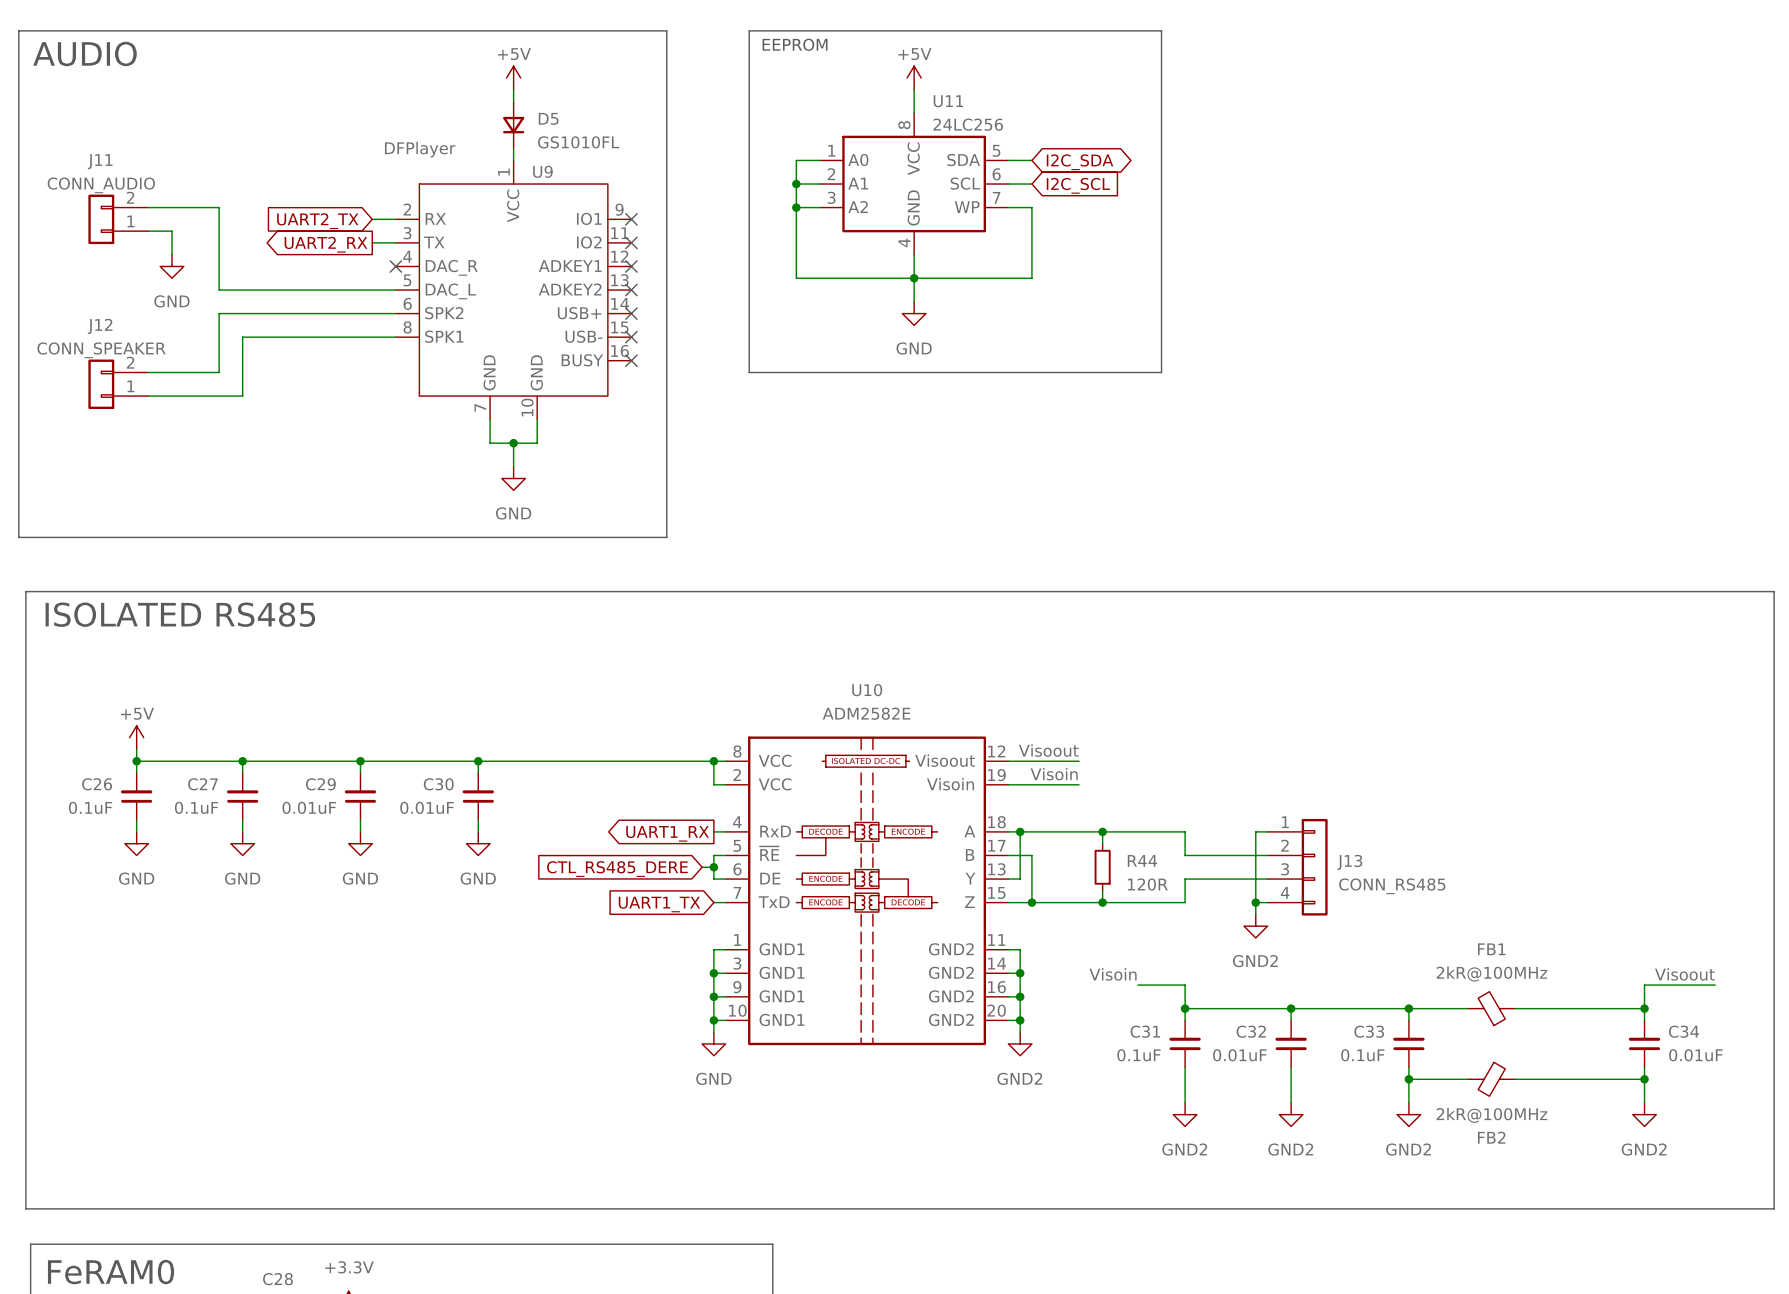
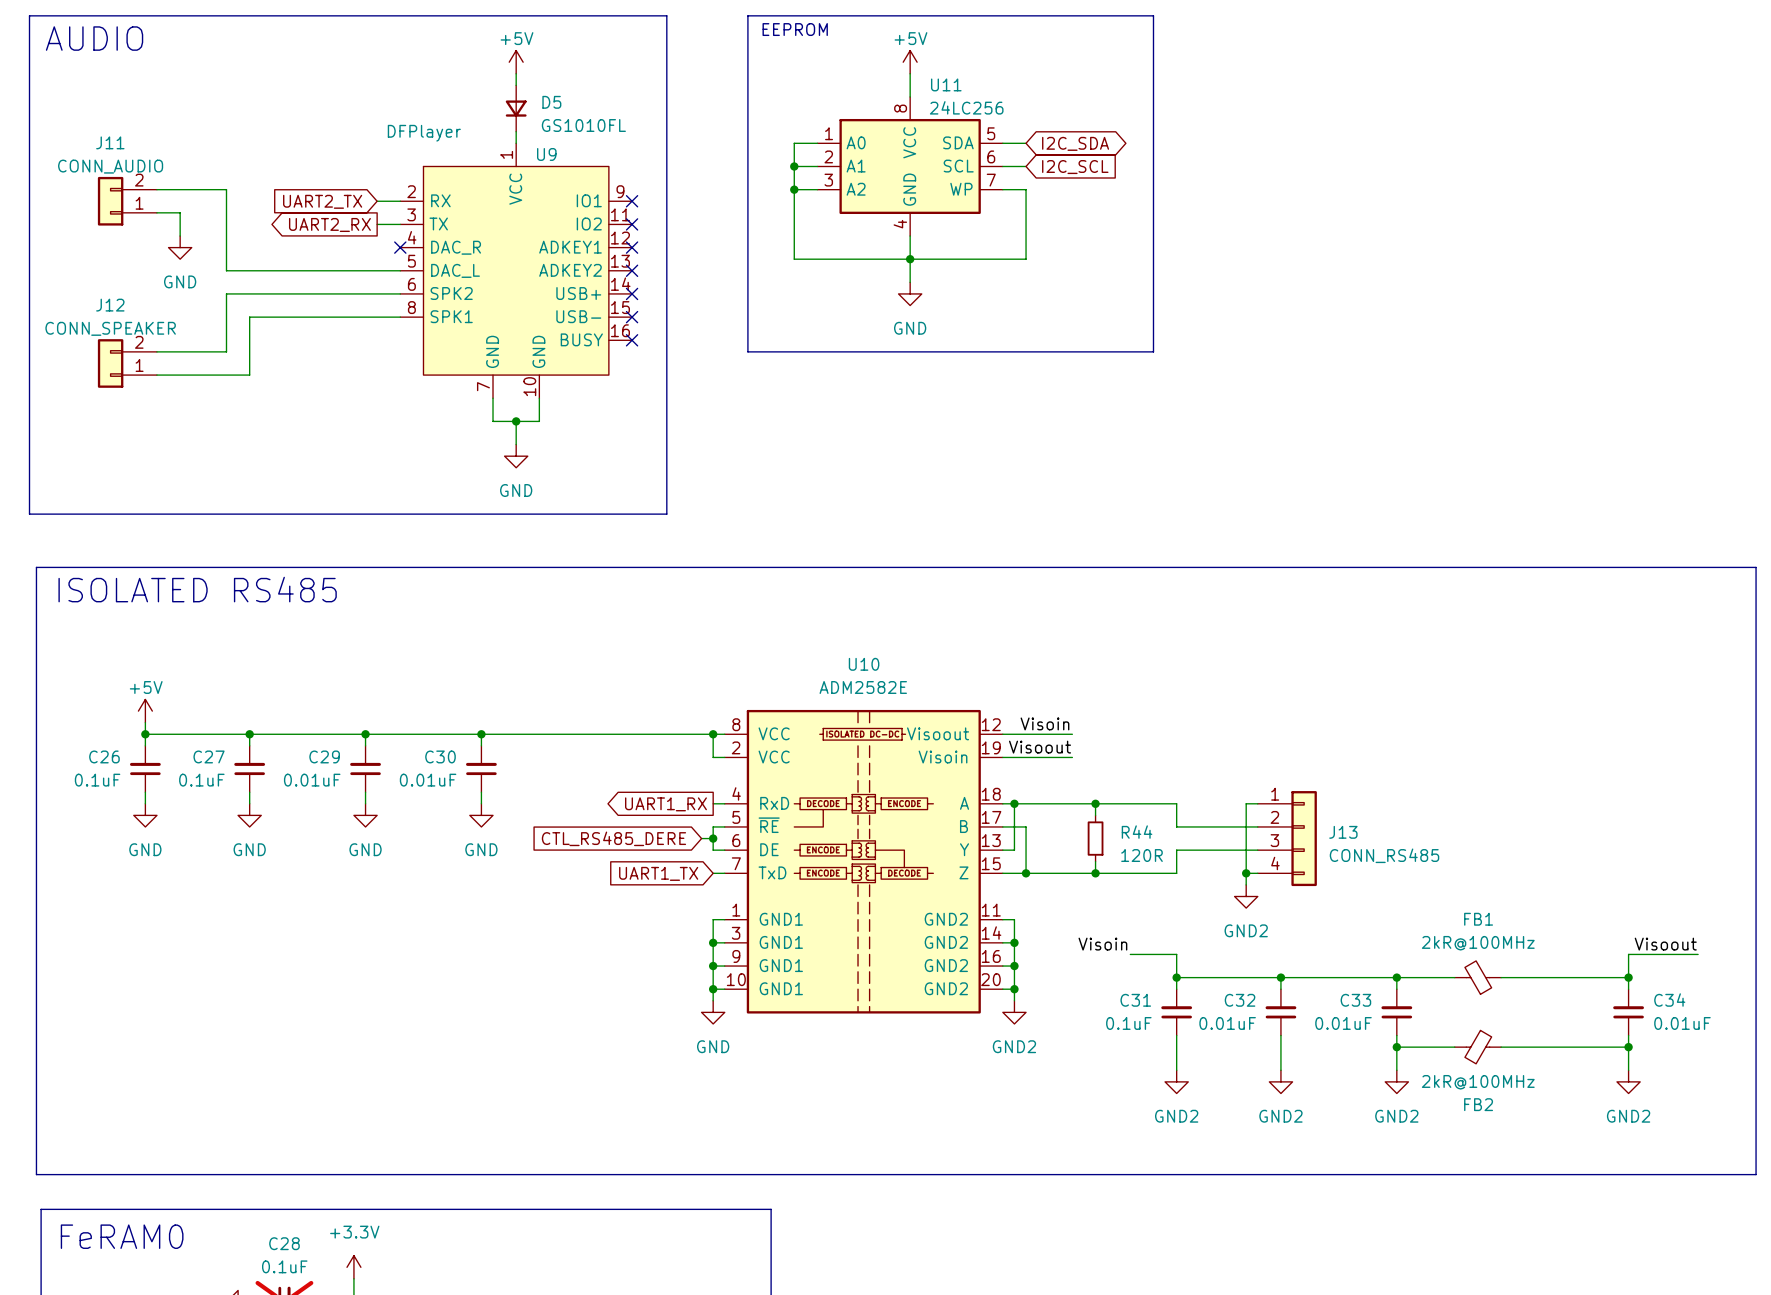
label: Visoout (1048, 750) -> Visoin (1044, 723)
label: Visoin (1054, 774) -> Visoout (1040, 747)
C33 value: 0.1uF (1362, 1055) -> 0.01uF (1343, 1023)

